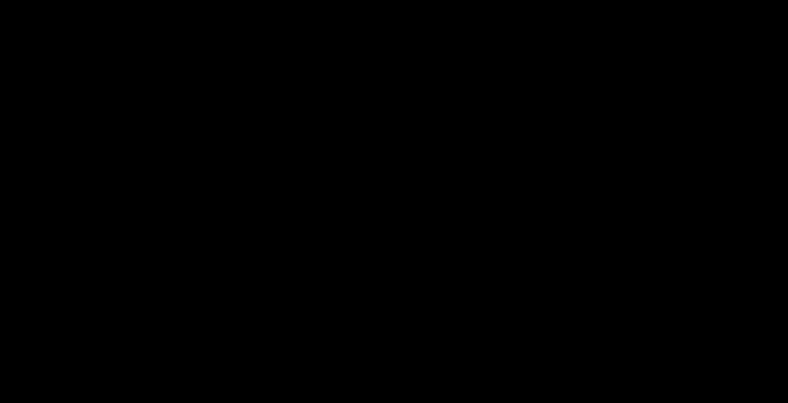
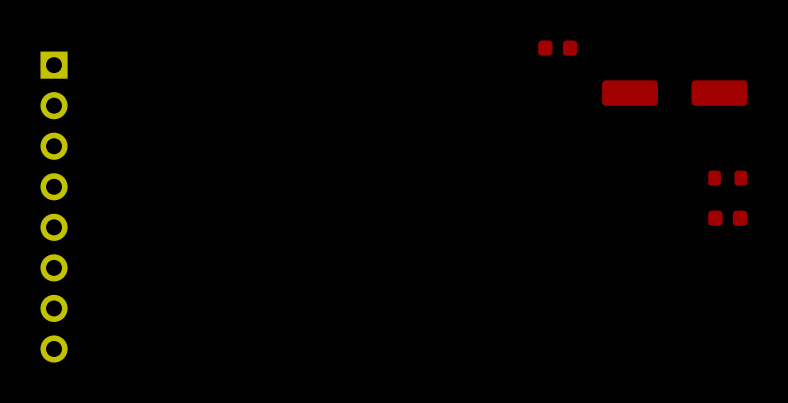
part: none -> (557, 48)
part: none -> (674, 93)
part: none -> (727, 178)
part: none -> (54, 207)
part: none -> (727, 218)

